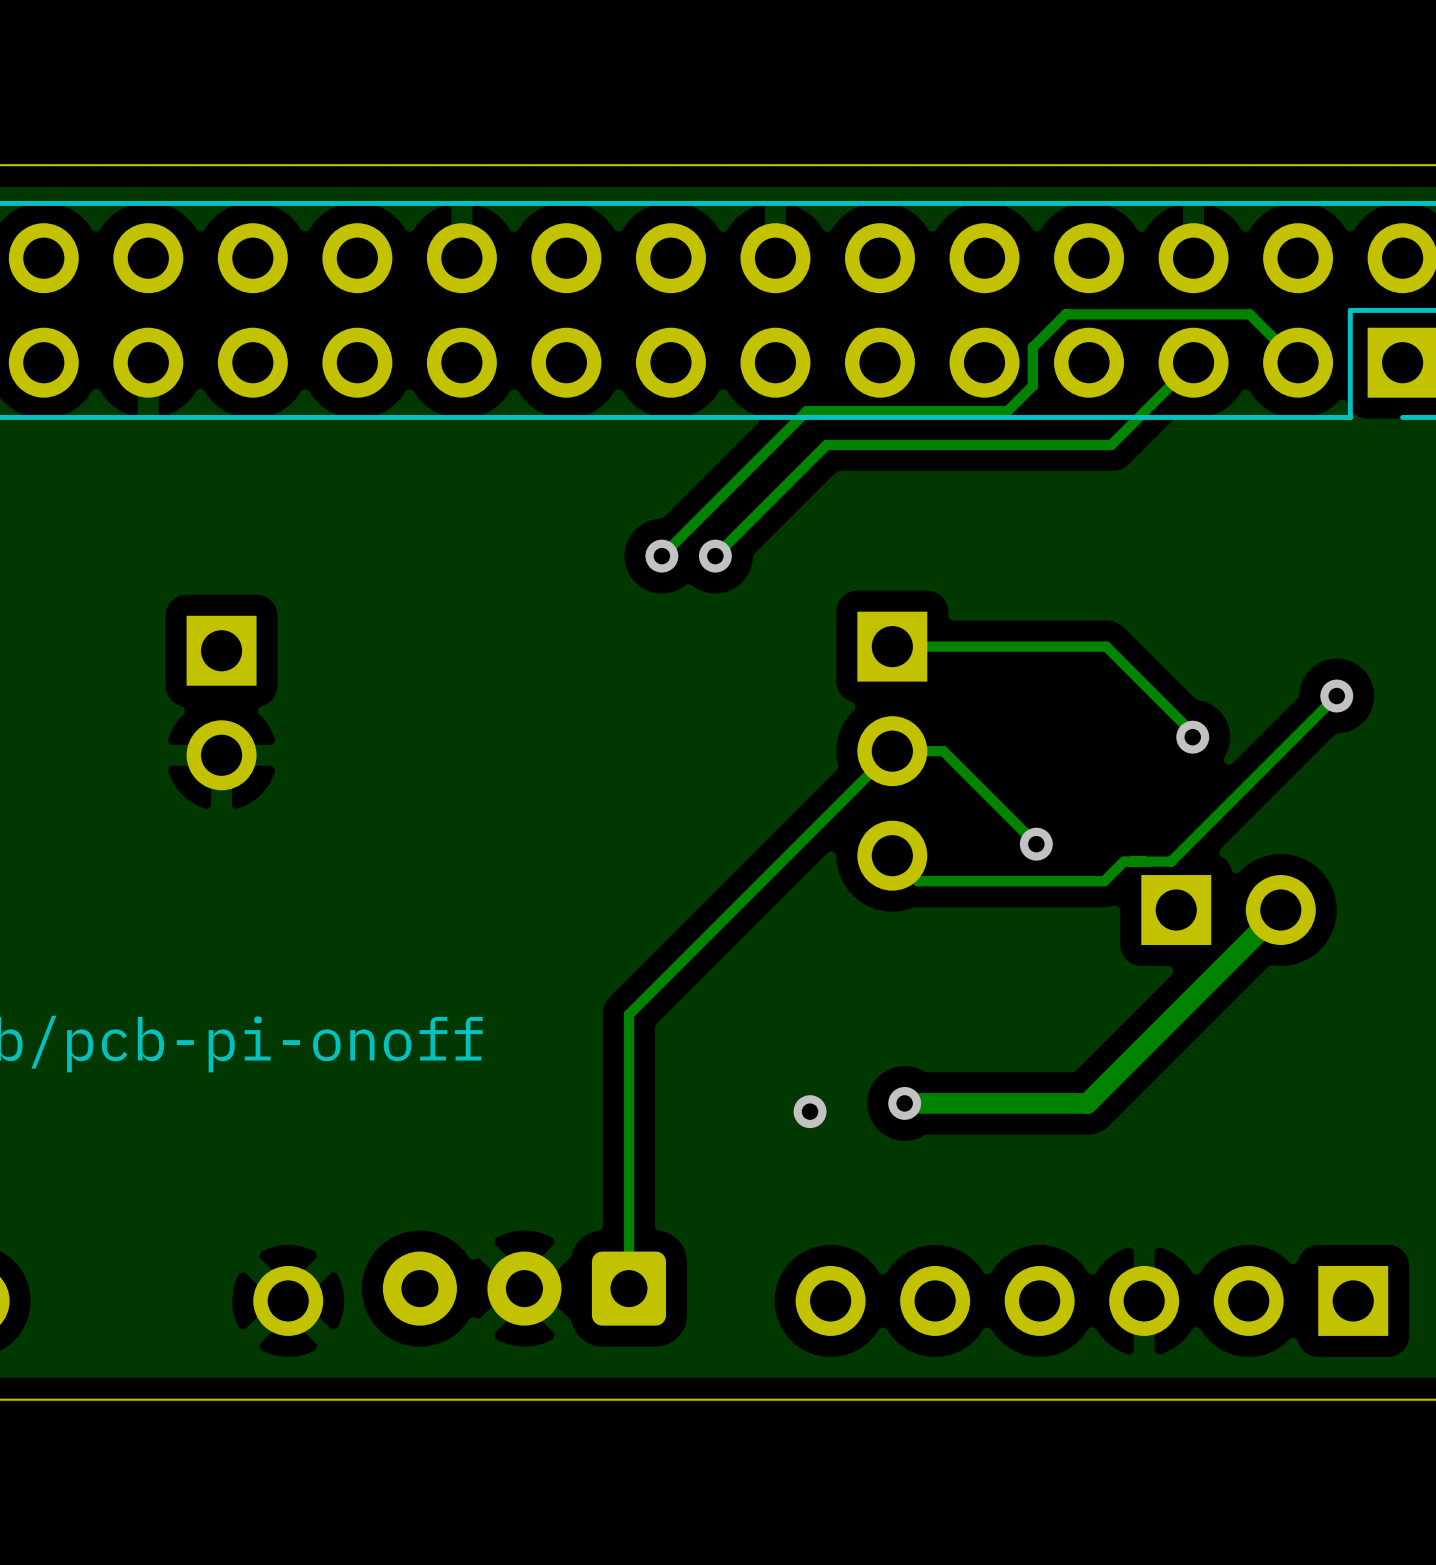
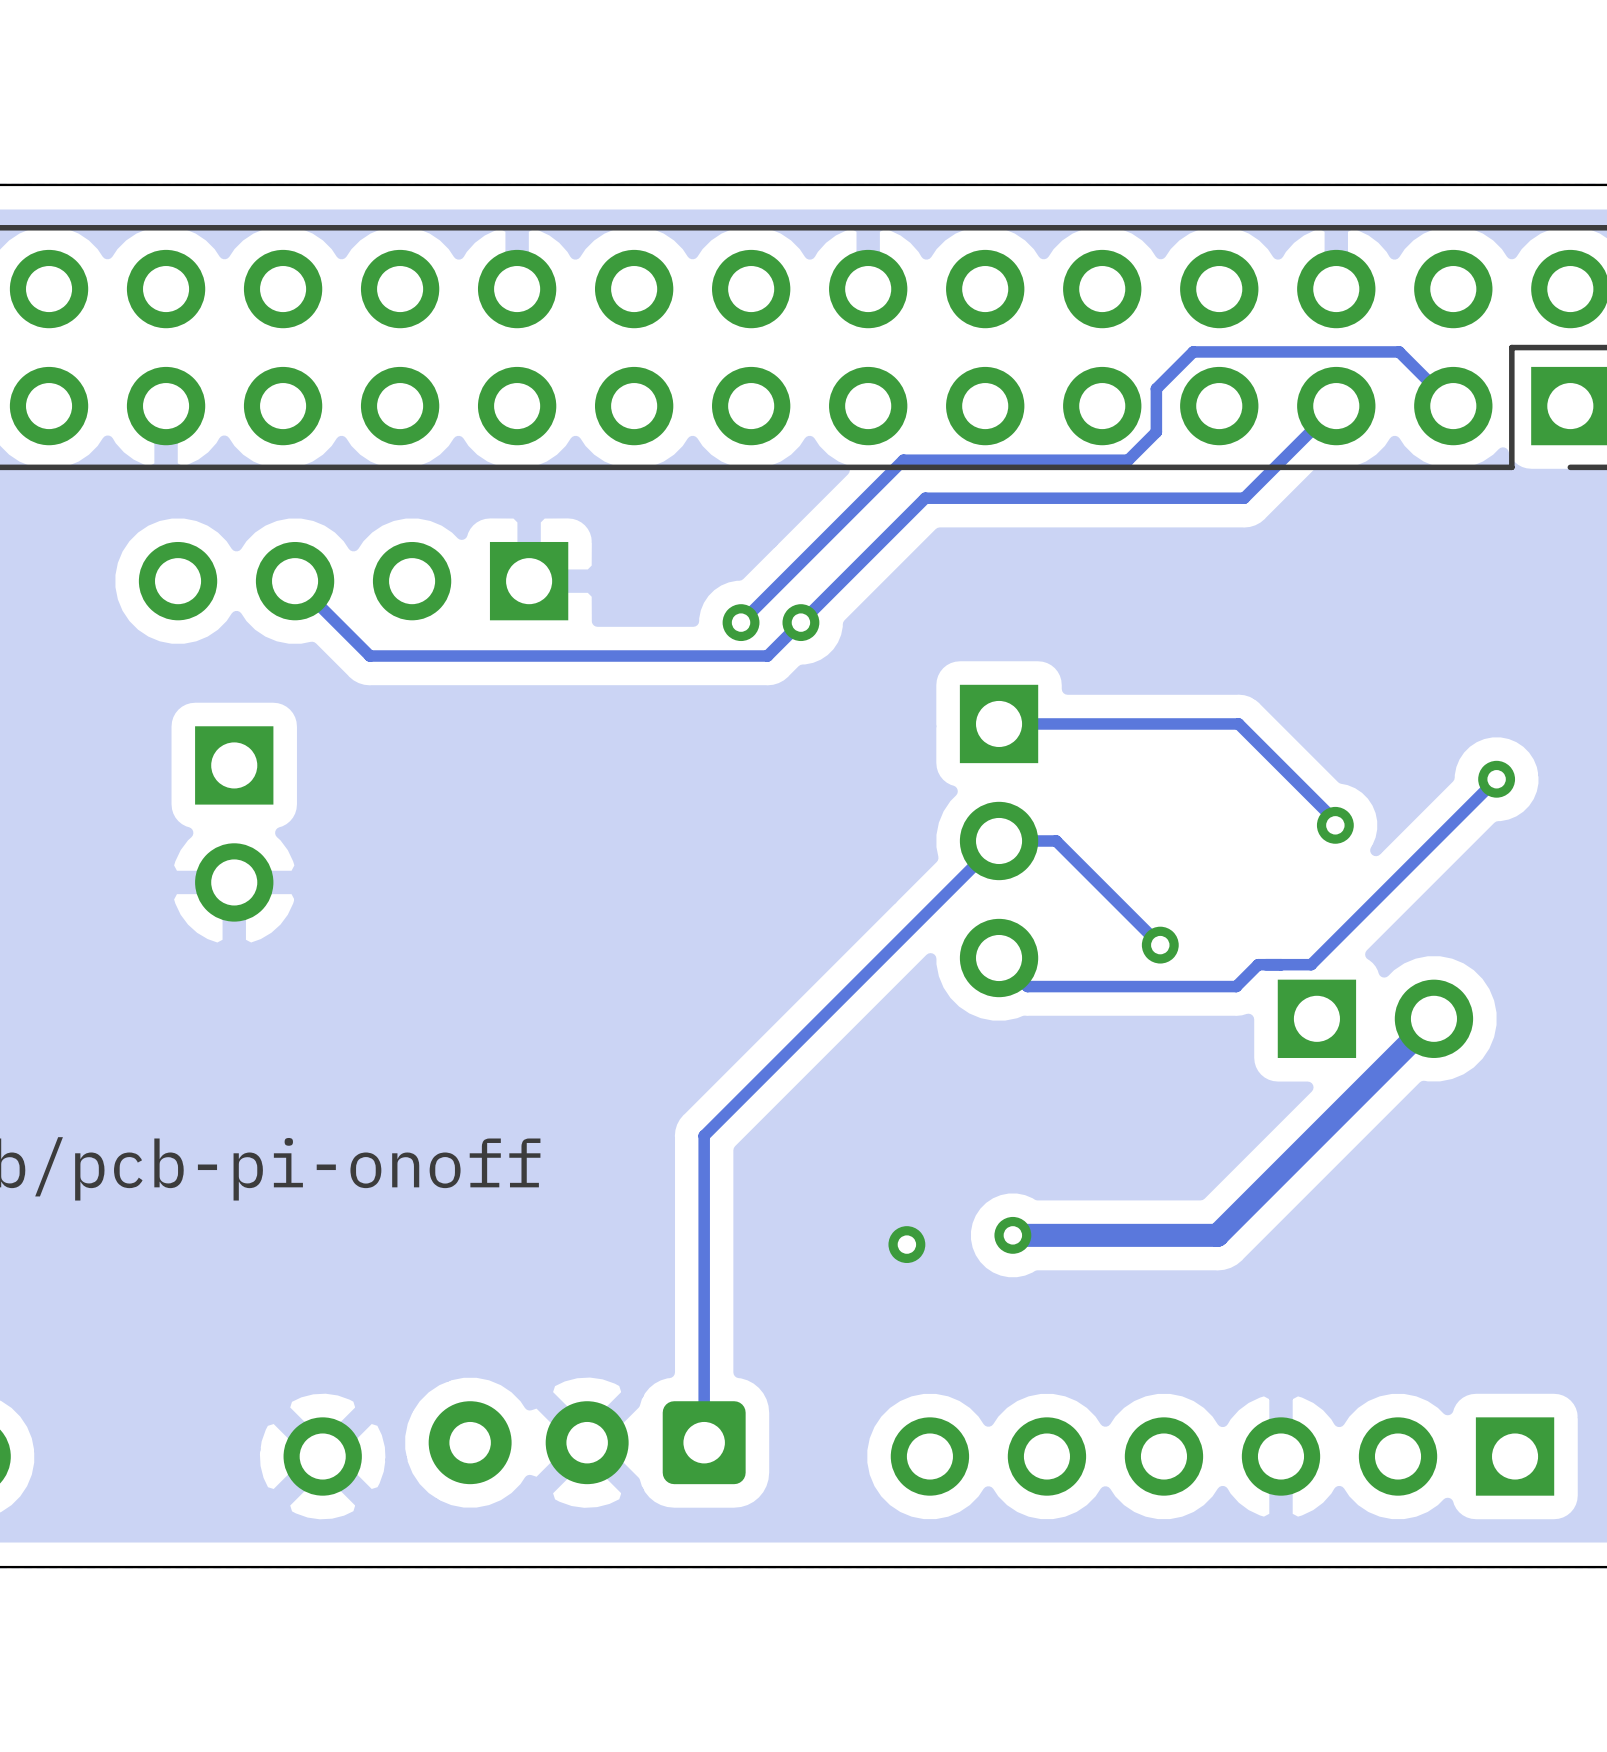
track: none -> (295, 581) (369, 656) (767, 656) (800, 622)
part: none -> (353, 581)
part position: (221, 703) -> (234, 823)

